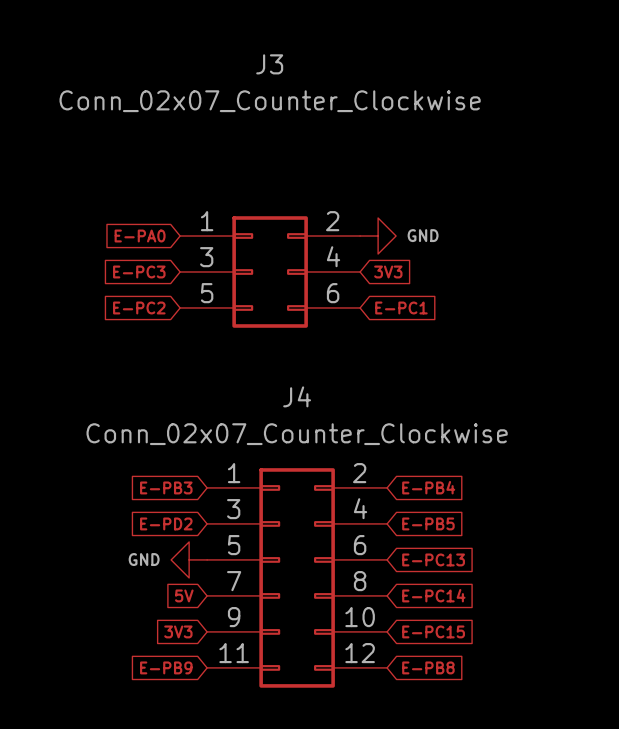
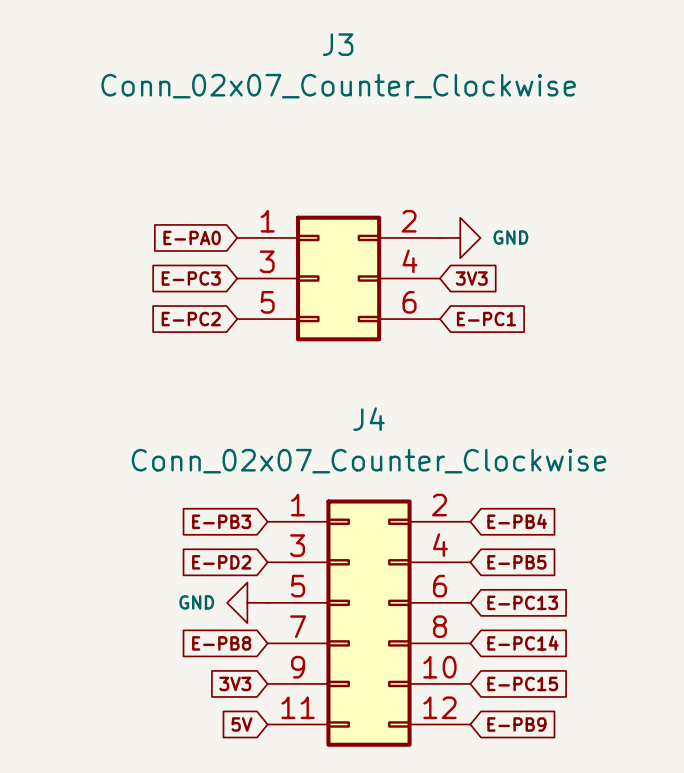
global label: 5V (184, 595) -> E-PB8 (221, 643)
global label: E-PB9 (166, 667) -> 5V (241, 724)
global label: E-PB8 (428, 667) -> E-PB9 (516, 724)

